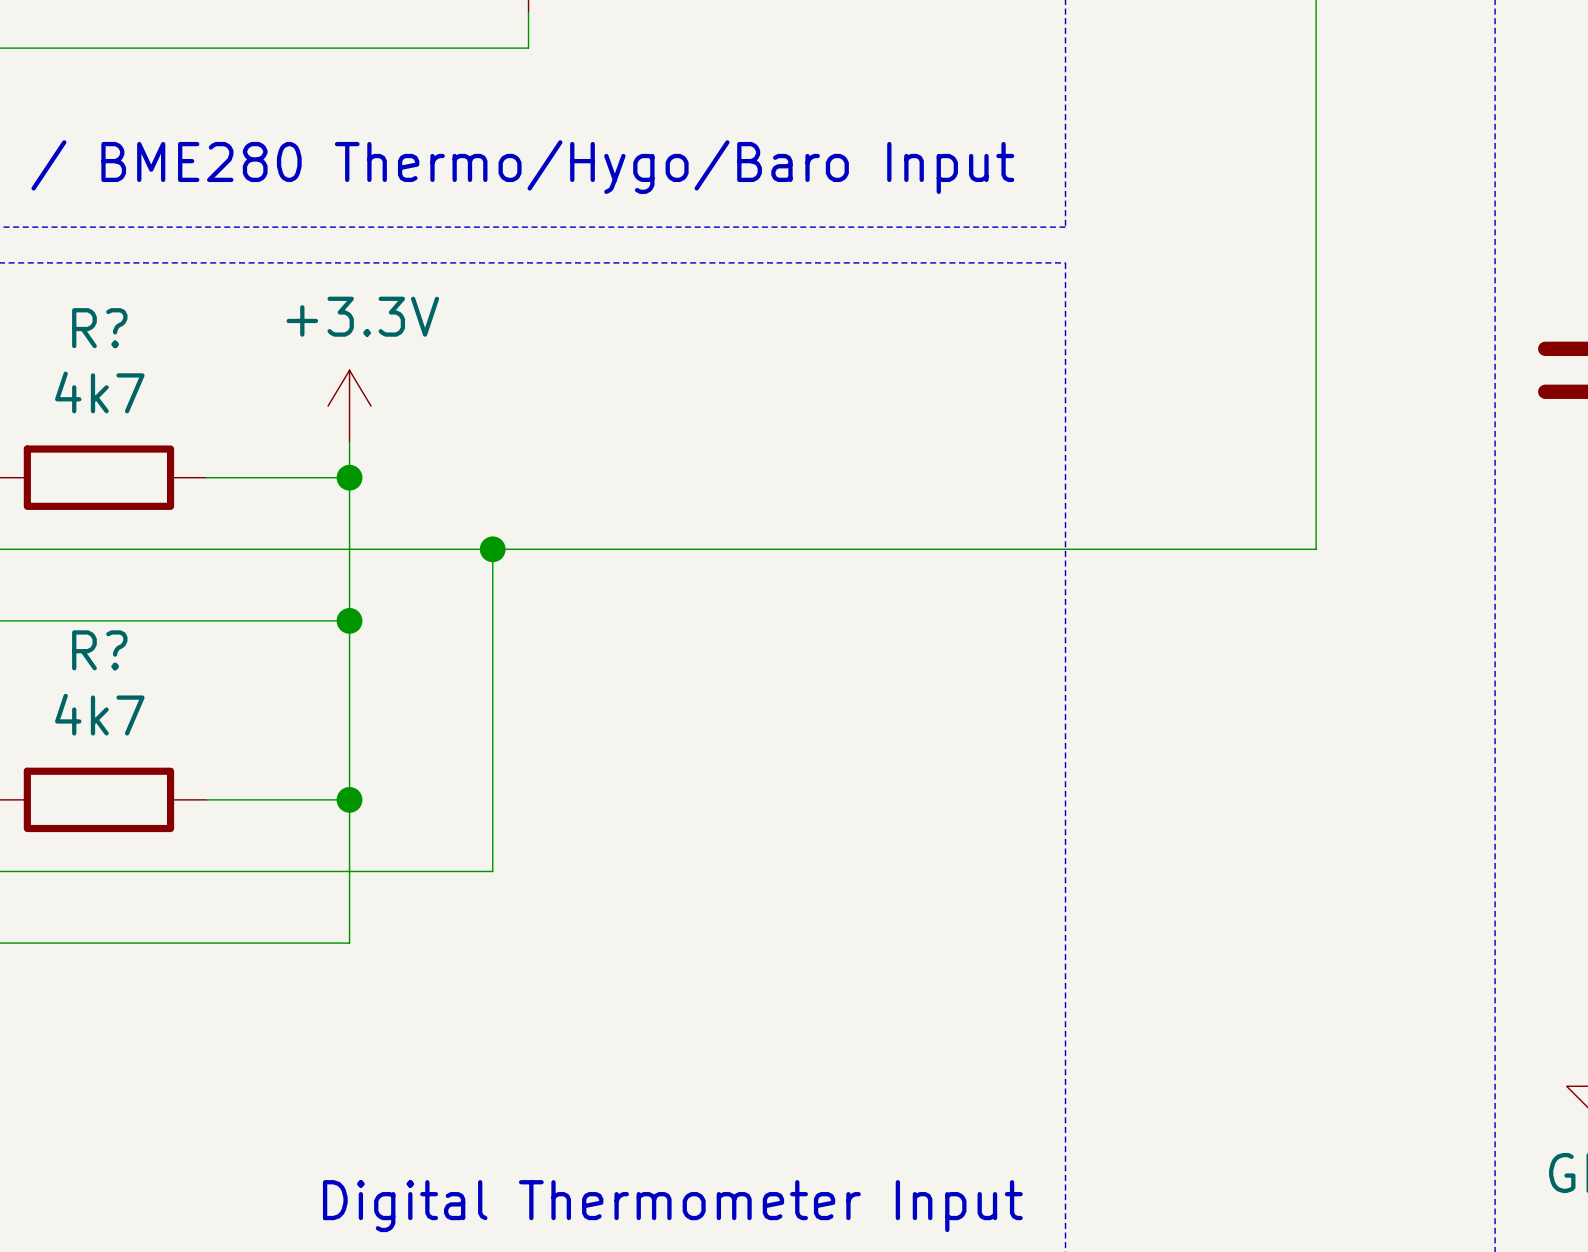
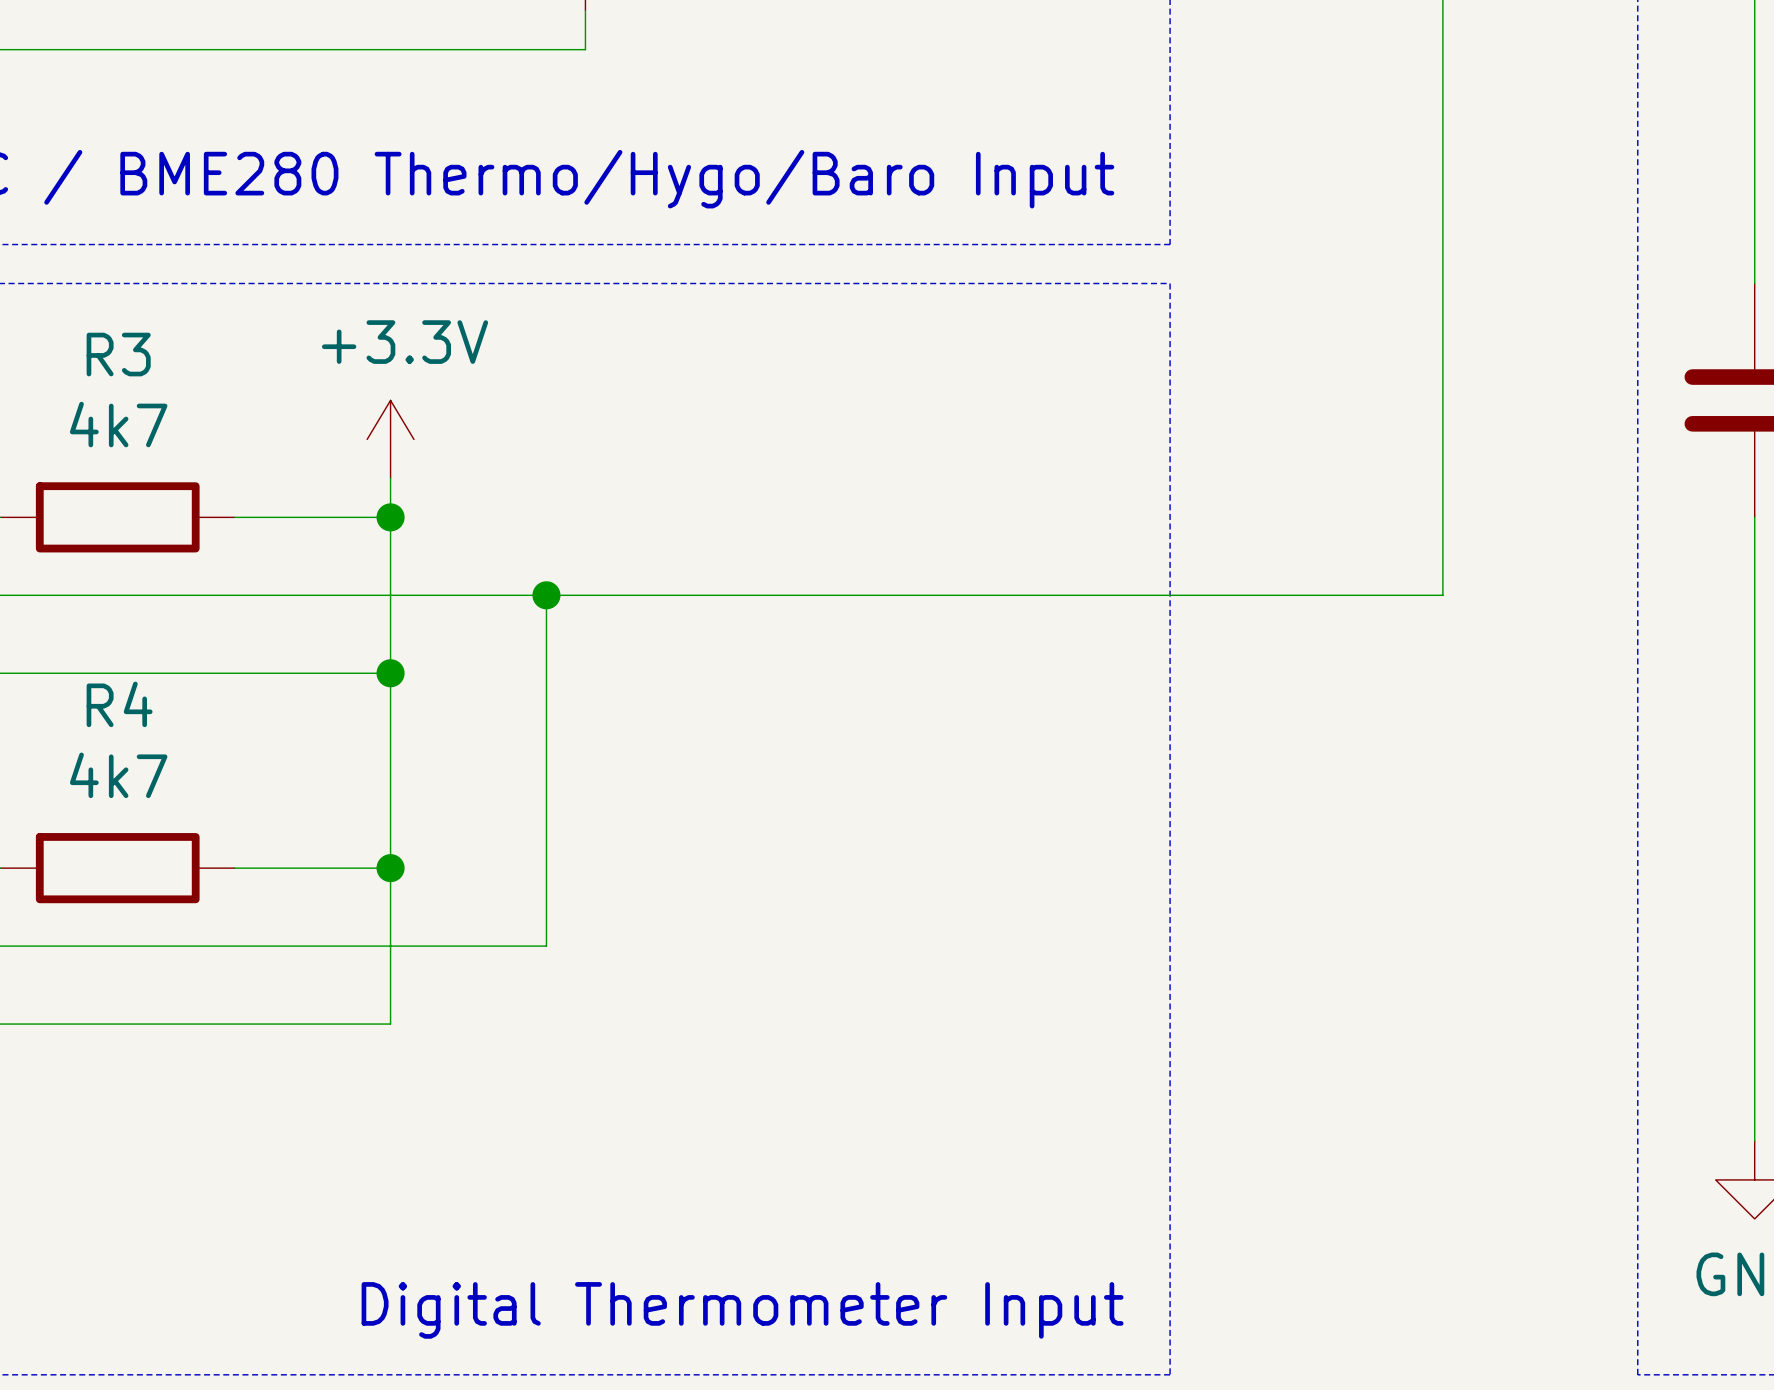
R? name: R? (99, 328) -> R3 (118, 354)
R? name: R? (99, 650) -> R4 (119, 704)

